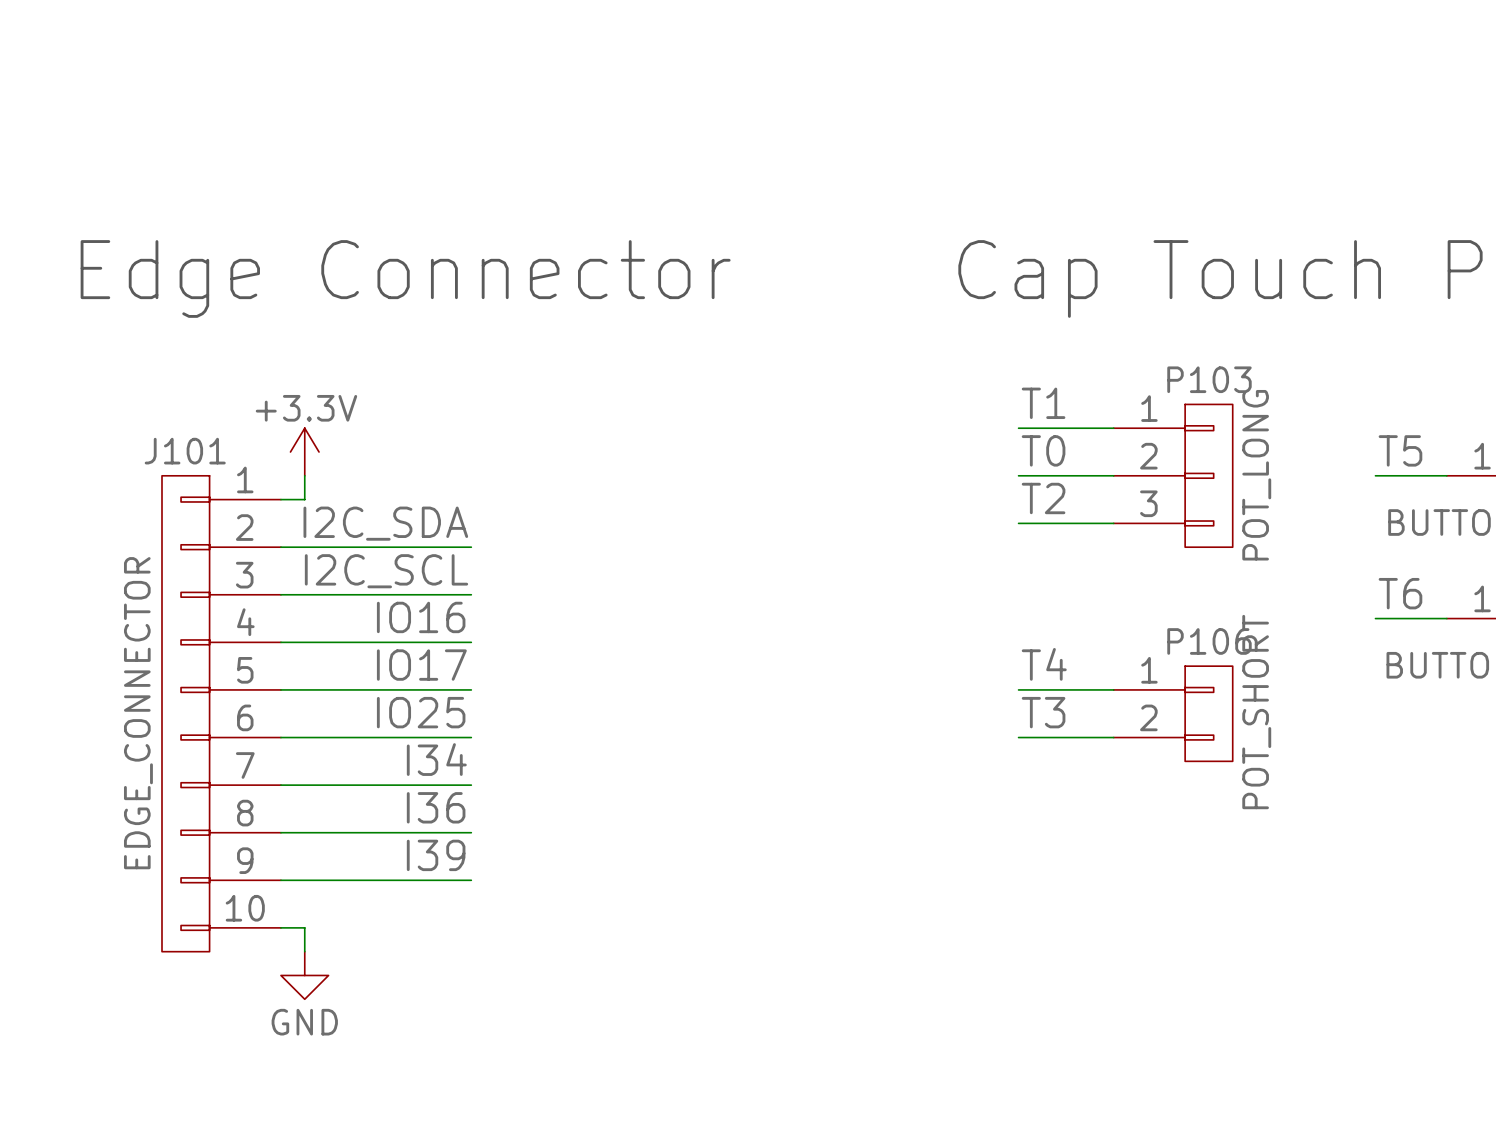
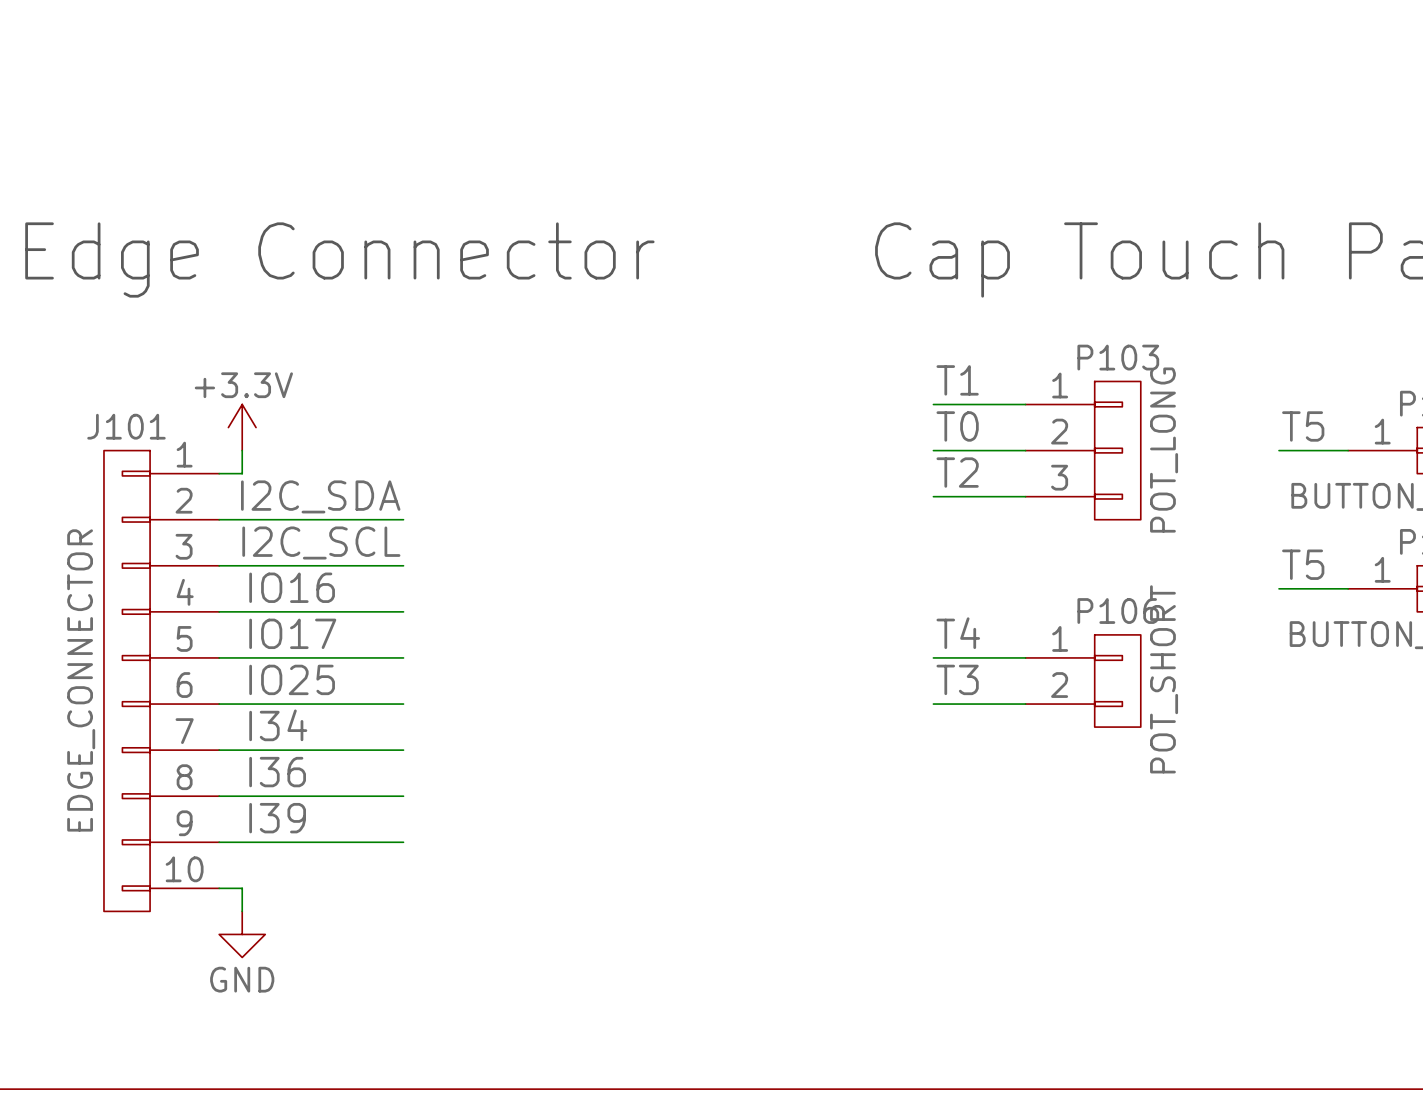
label: T6 (1400, 593) -> T5 (1303, 564)
label position: IO16 (421, 617) -> IO16 (292, 587)
label position: IO17 (421, 665) -> IO17 (292, 633)
label position: IO25 (421, 712) -> IO25 (292, 679)
label position: I34 (436, 759) -> I34 (278, 725)
label position: I36 (436, 807) -> I36 (277, 772)
label position: I39 (436, 855) -> I39 (277, 818)

